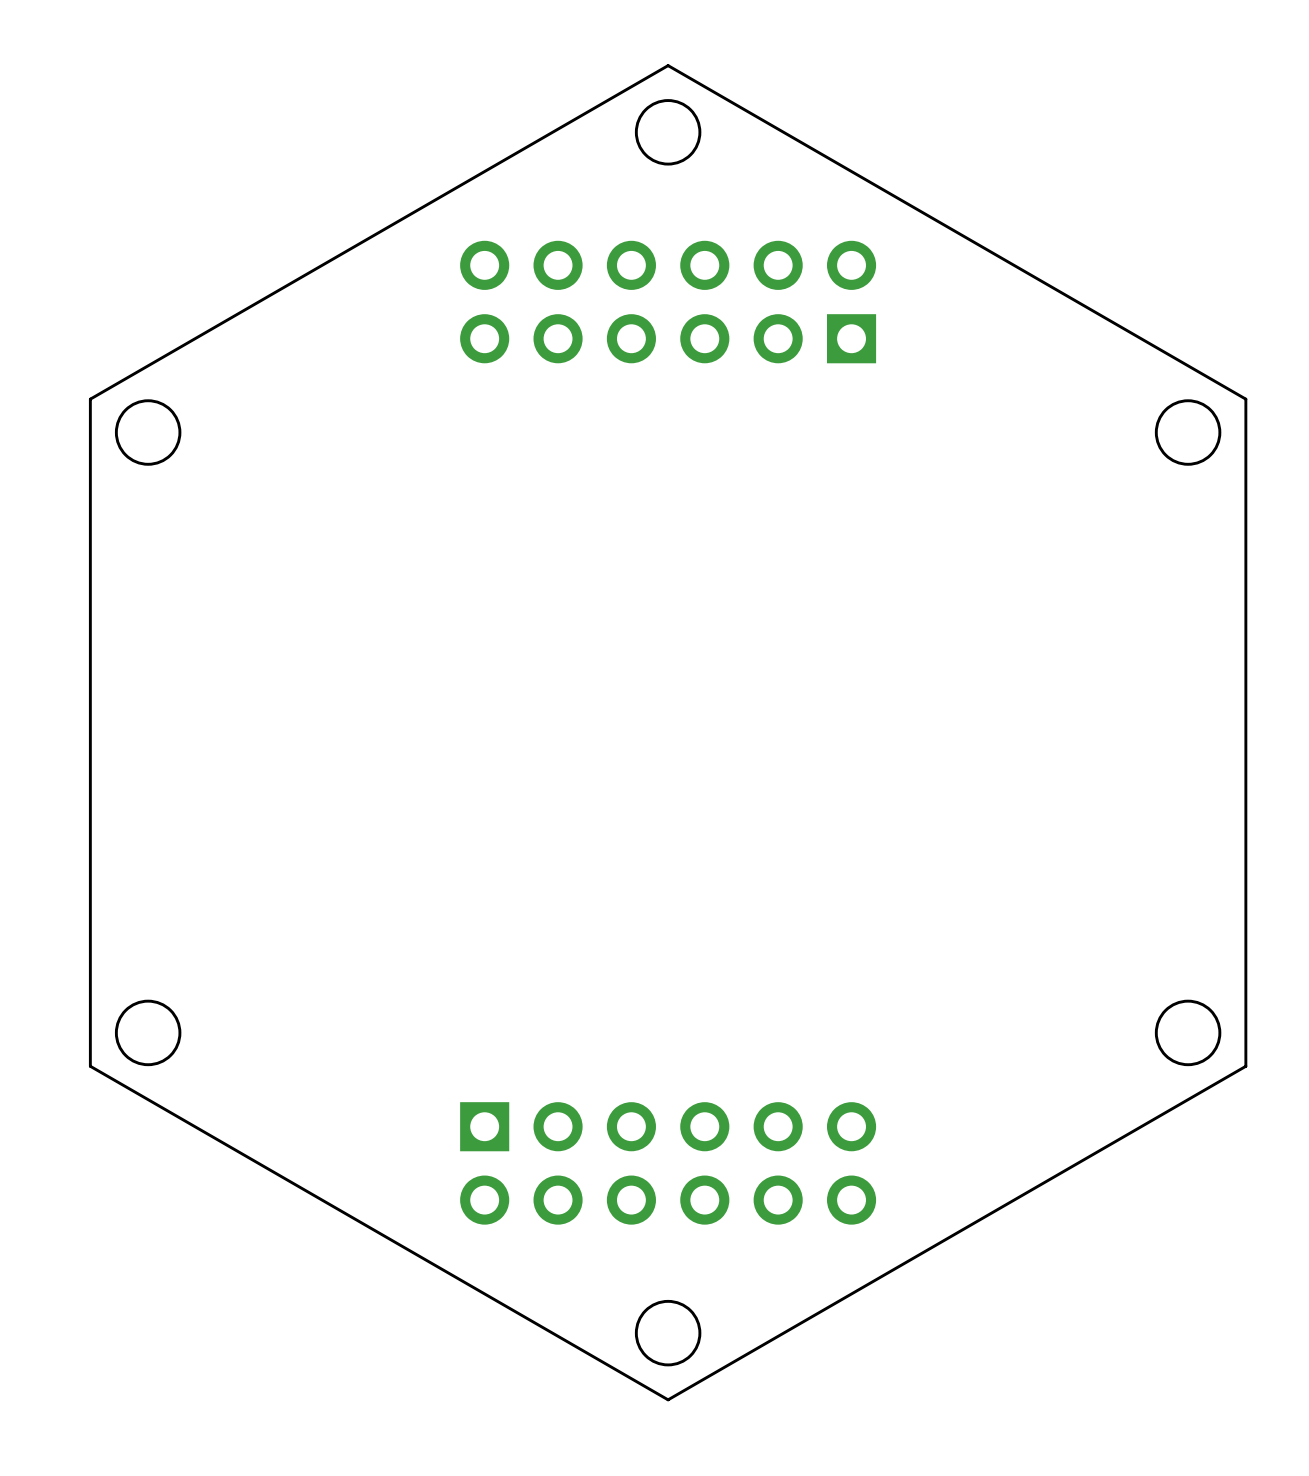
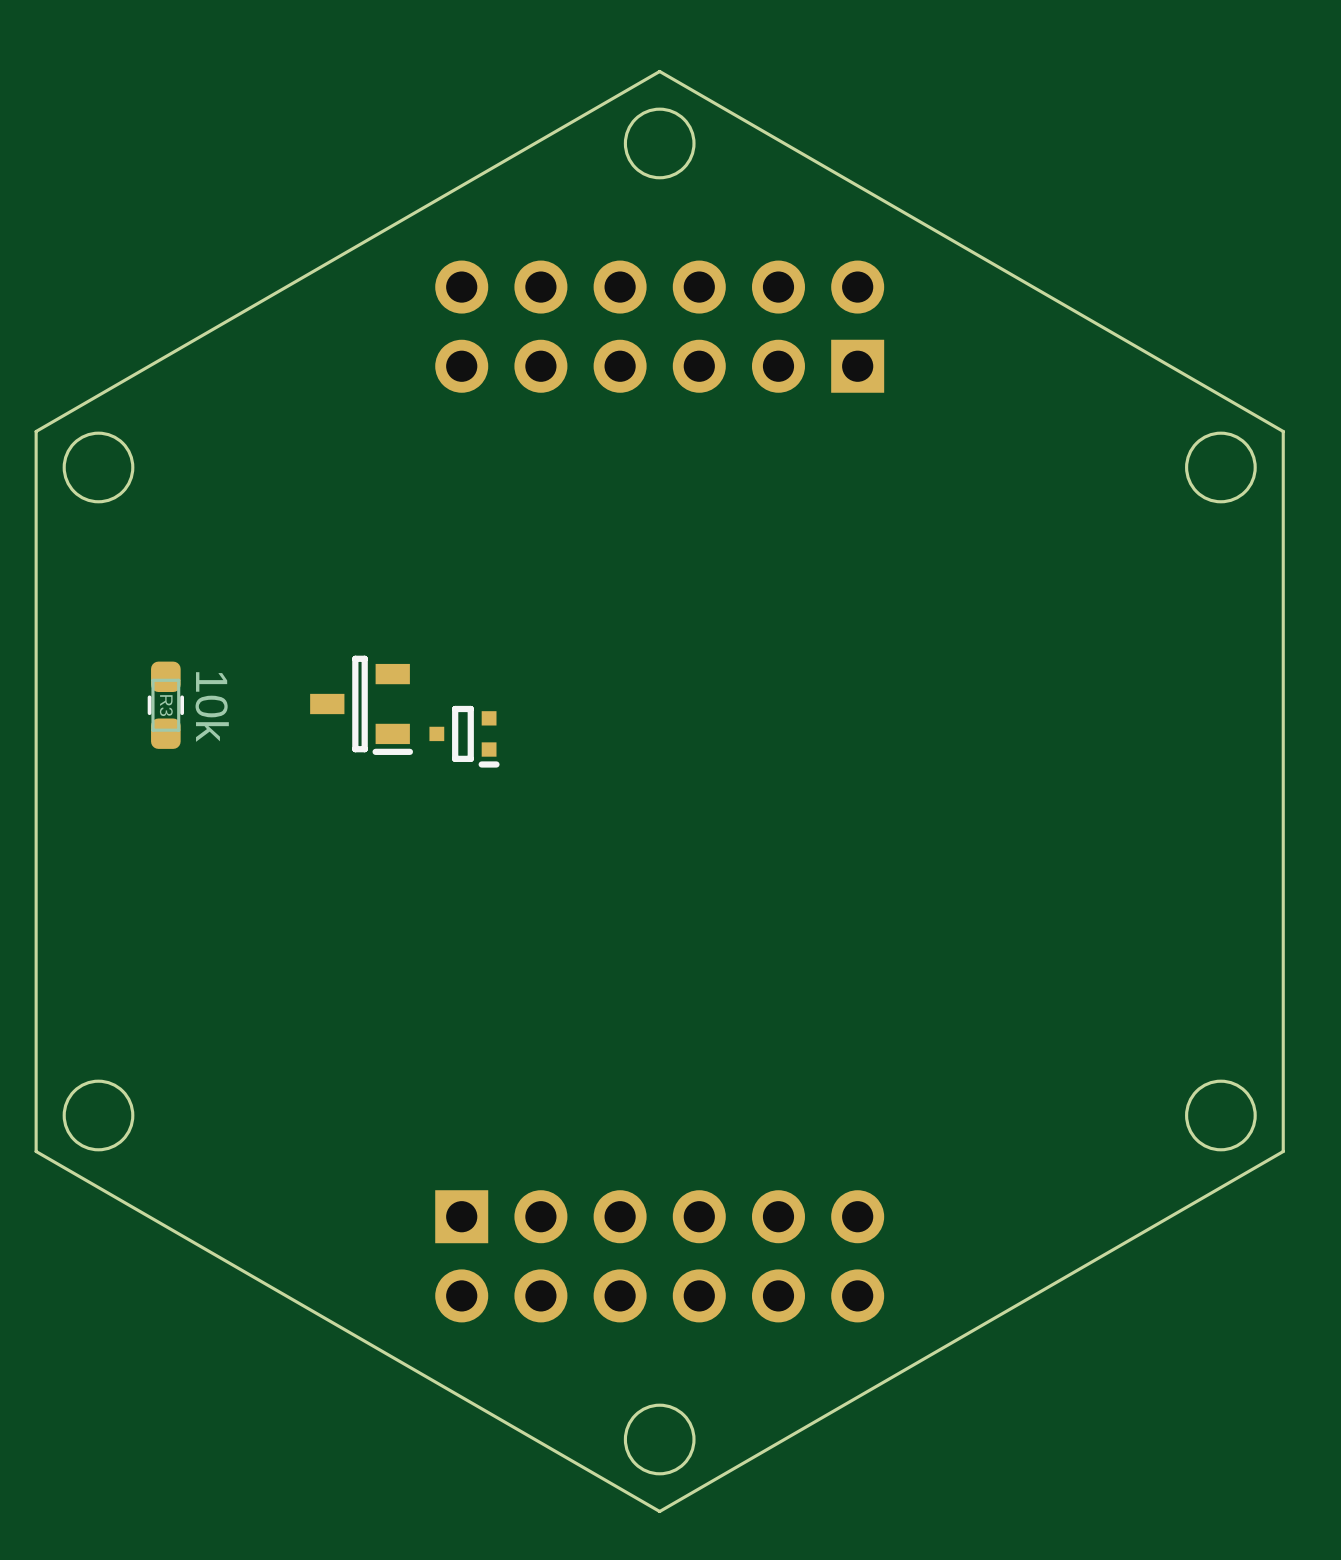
R3: none -> 10k (165, 705)
part: none -> (361, 705)
part: none -> (464, 736)

